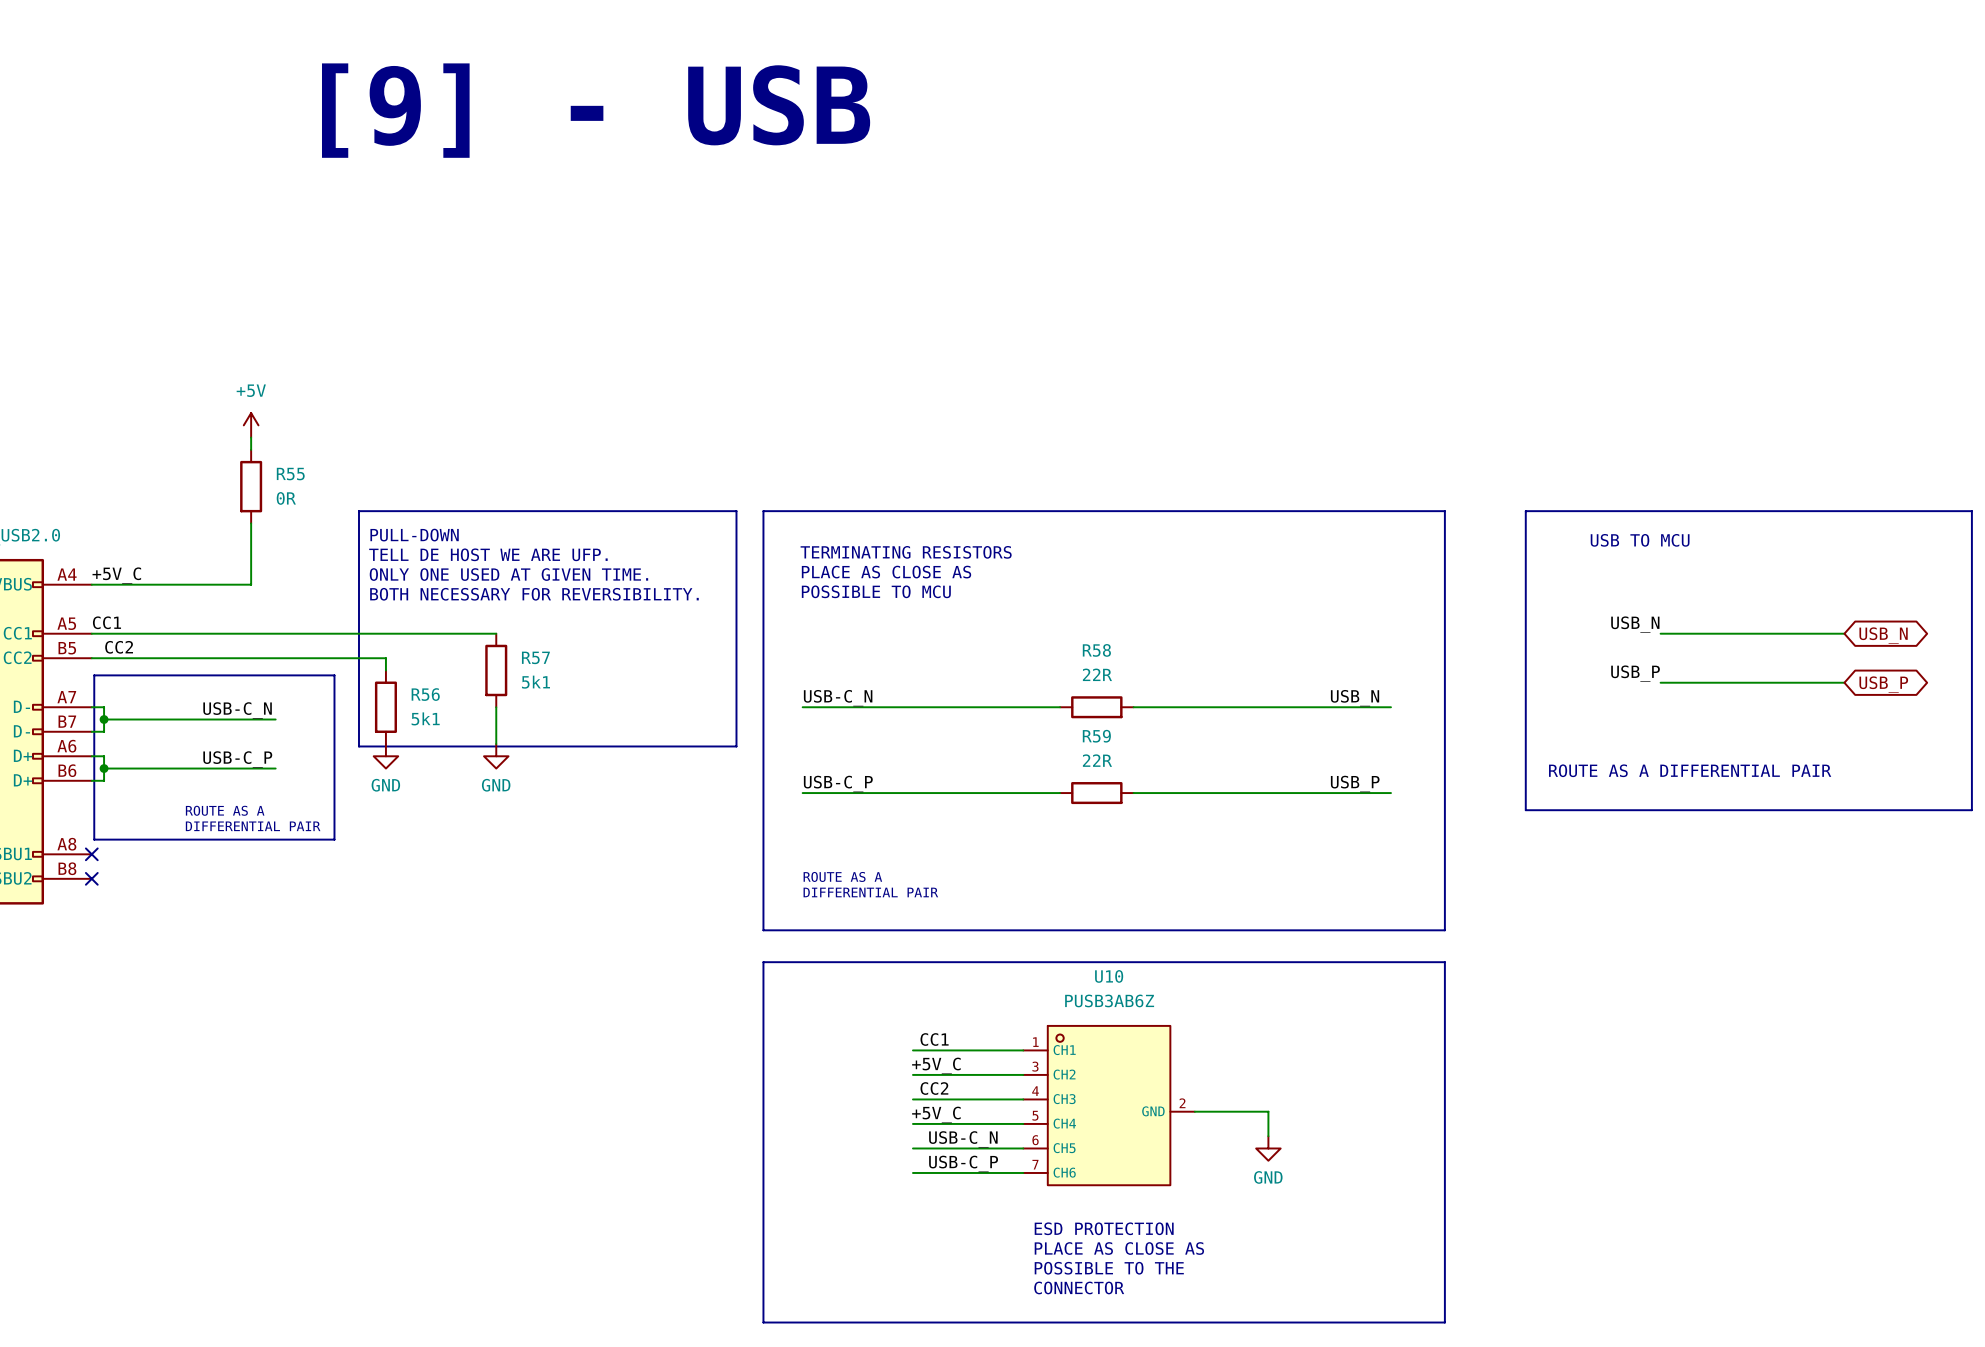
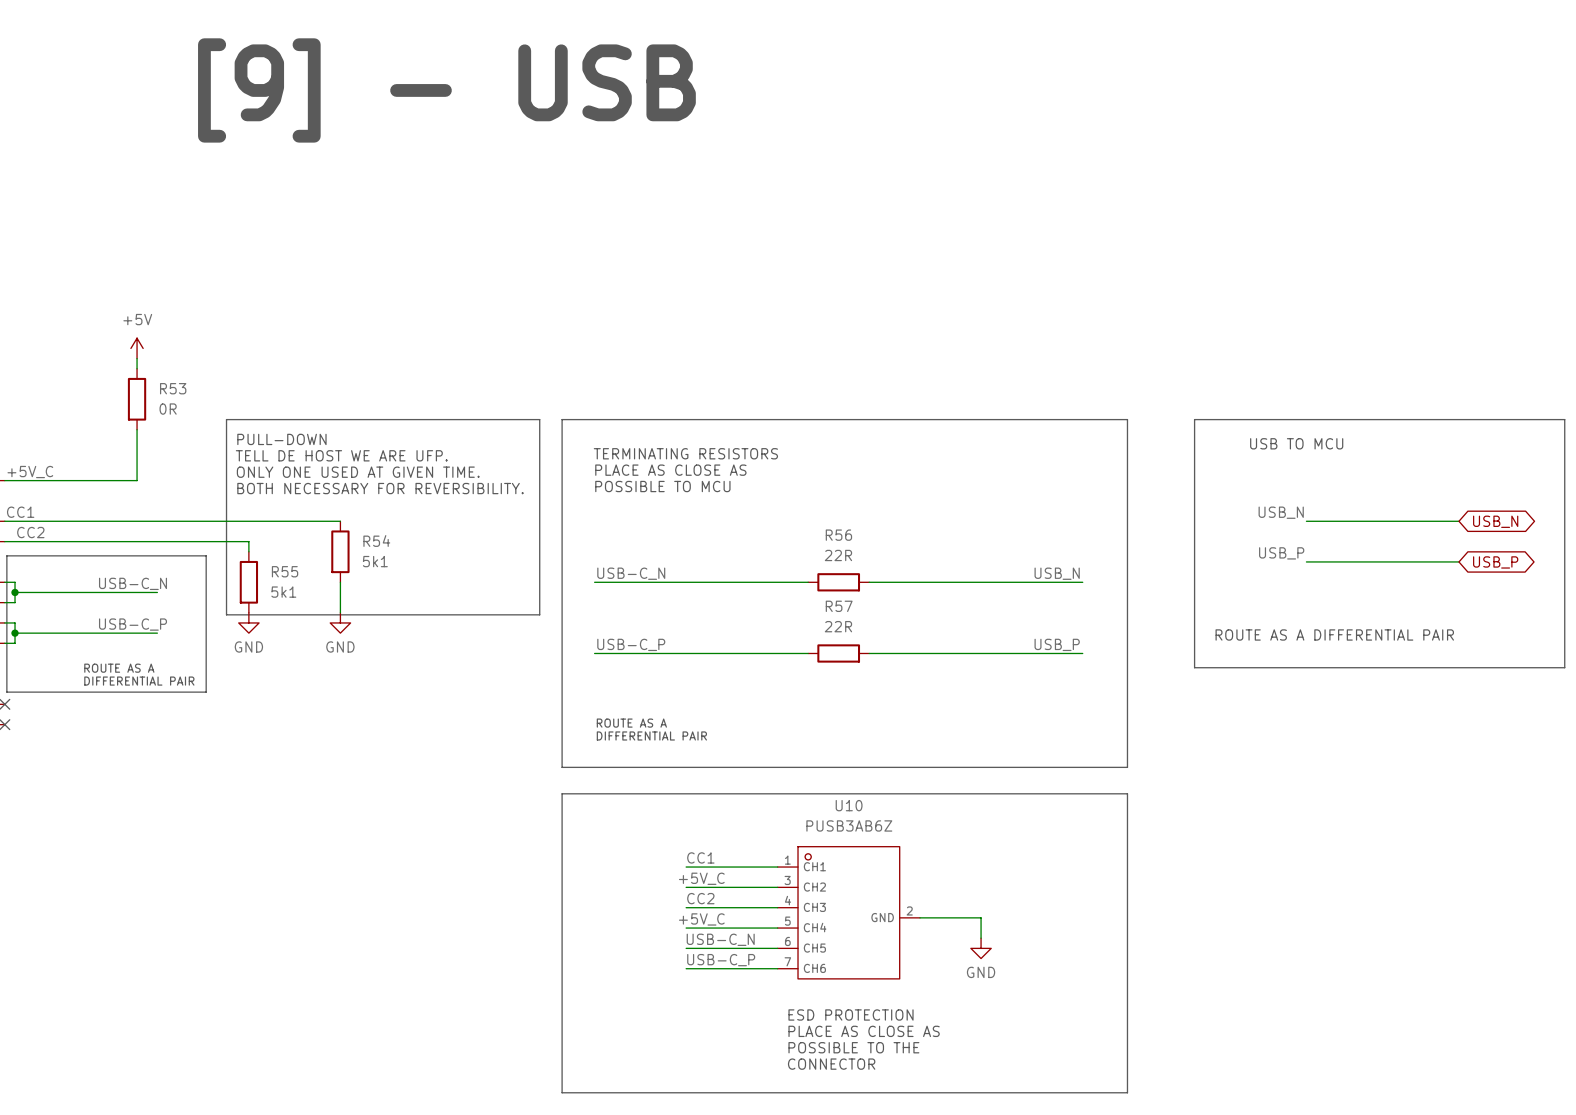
R55 name: R55 (290, 474) -> R53 (173, 388)
R58 name: R58 (1096, 650) -> R56 (838, 535)
R57 name: R57 (535, 657) -> R54 (376, 541)
R56 name: R56 (425, 694) -> R55 (285, 571)
R59 name: R59 (1096, 736) -> R57 (839, 606)

